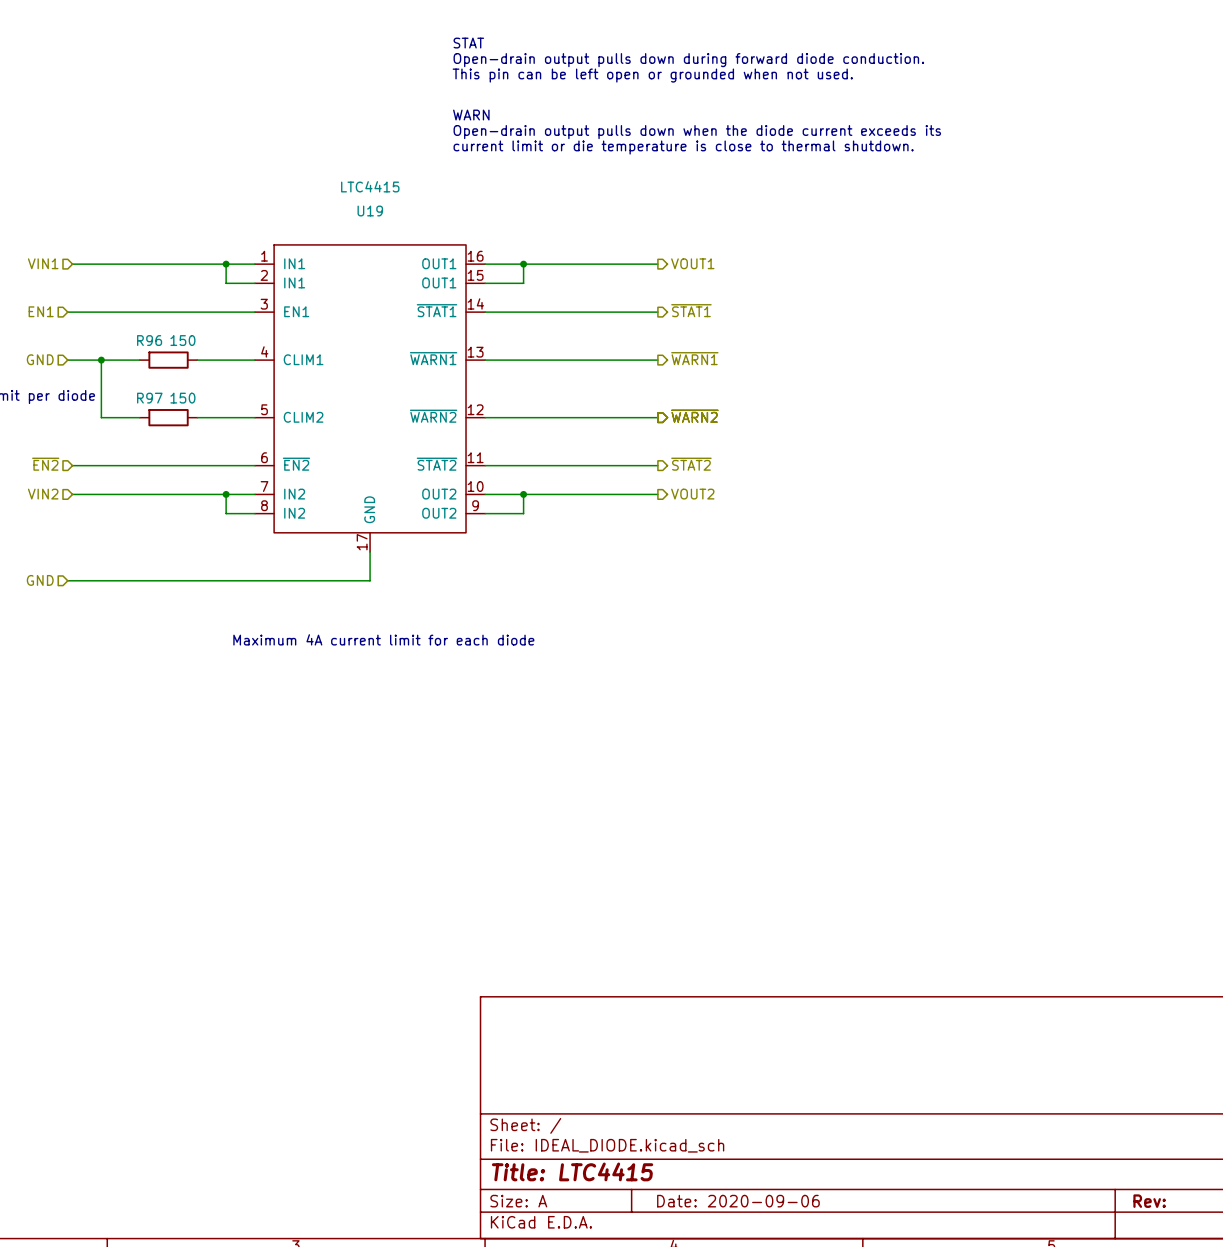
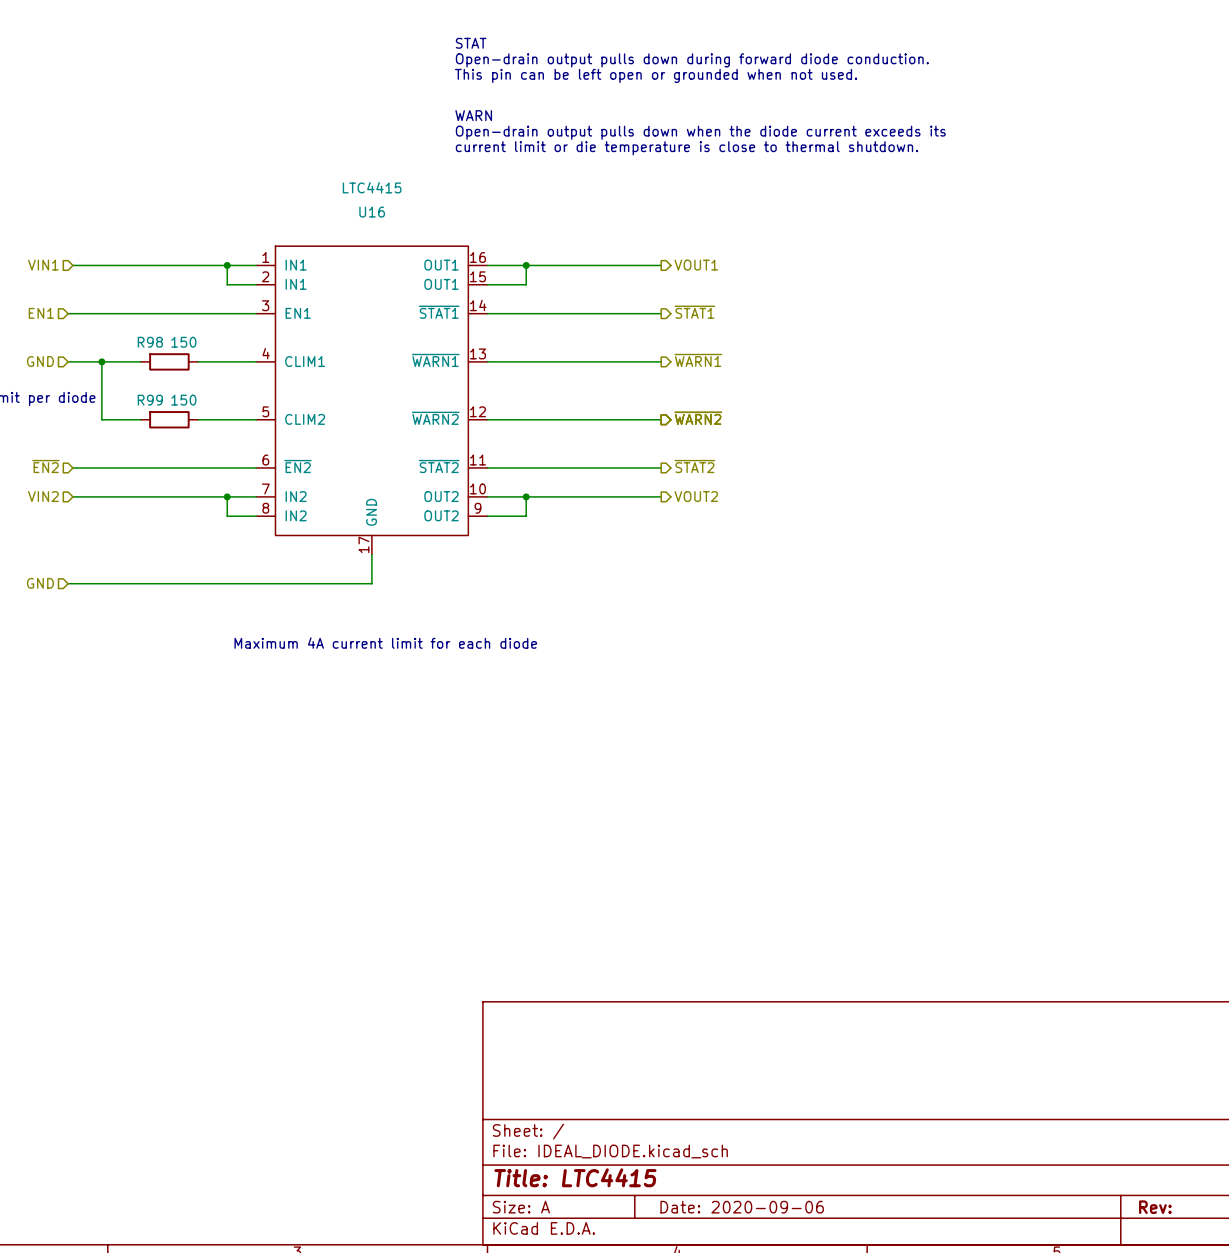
U19 name: U19 (370, 211) -> U16 (372, 212)
R96 name: R96 (149, 340) -> R98 (150, 342)
R97 name: R97 (149, 398) -> R99 (150, 400)

